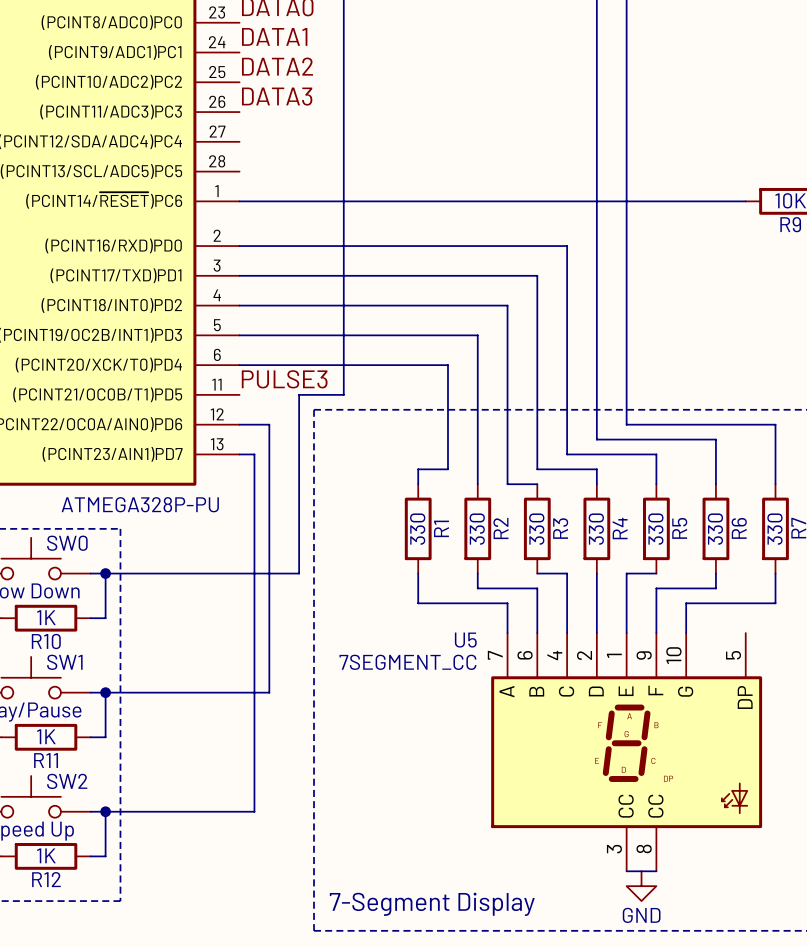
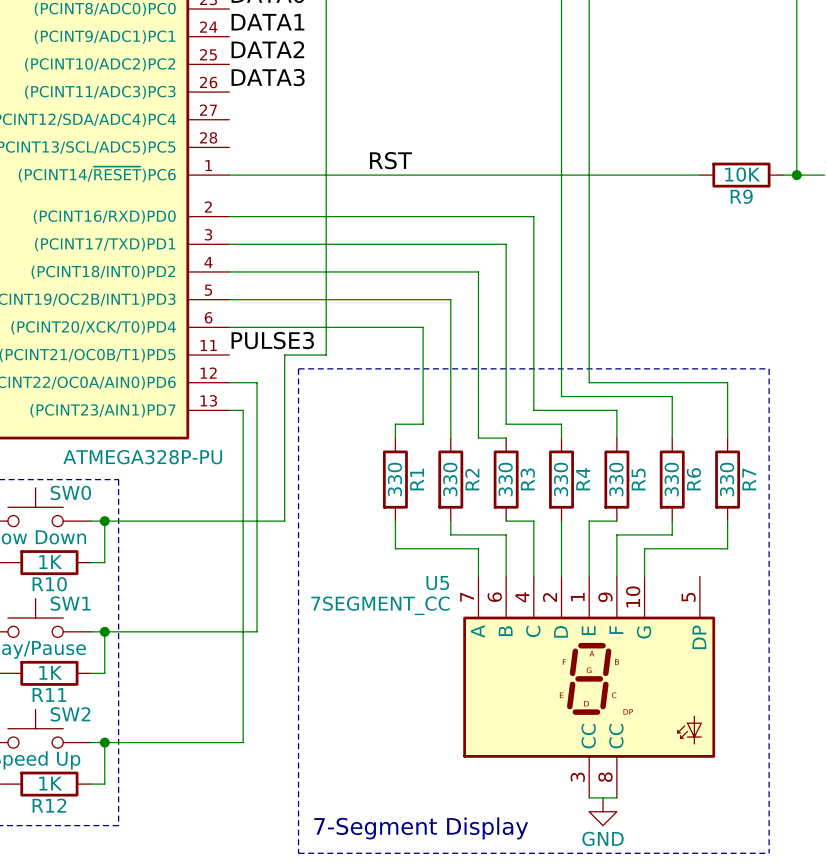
label: none -> RST (390, 160)

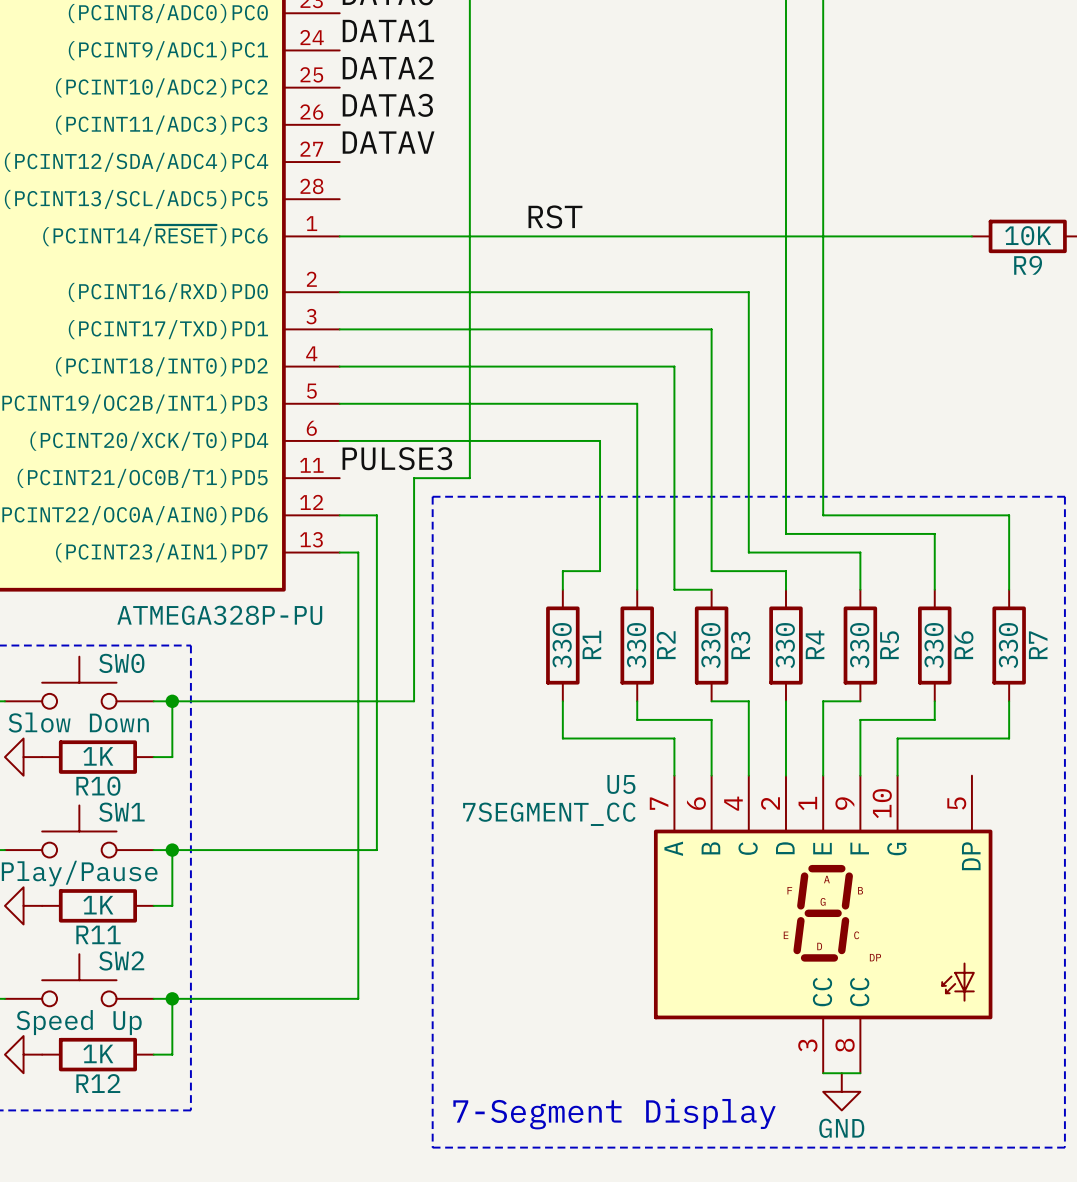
label: none -> DATAV (388, 142)

